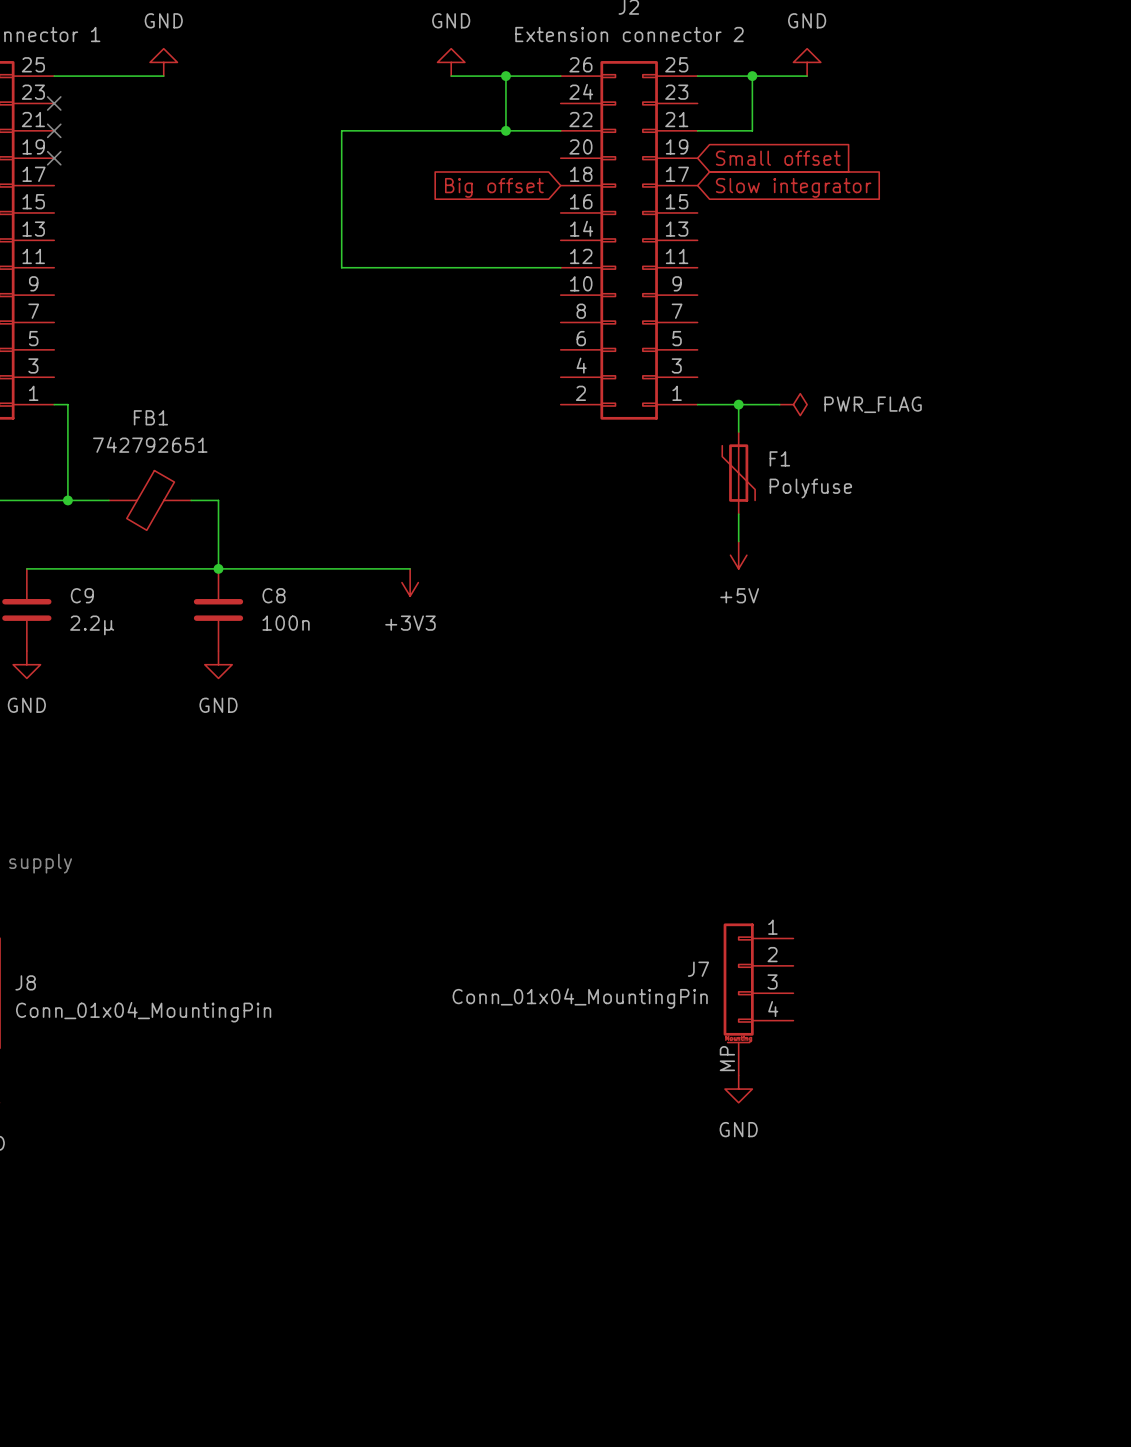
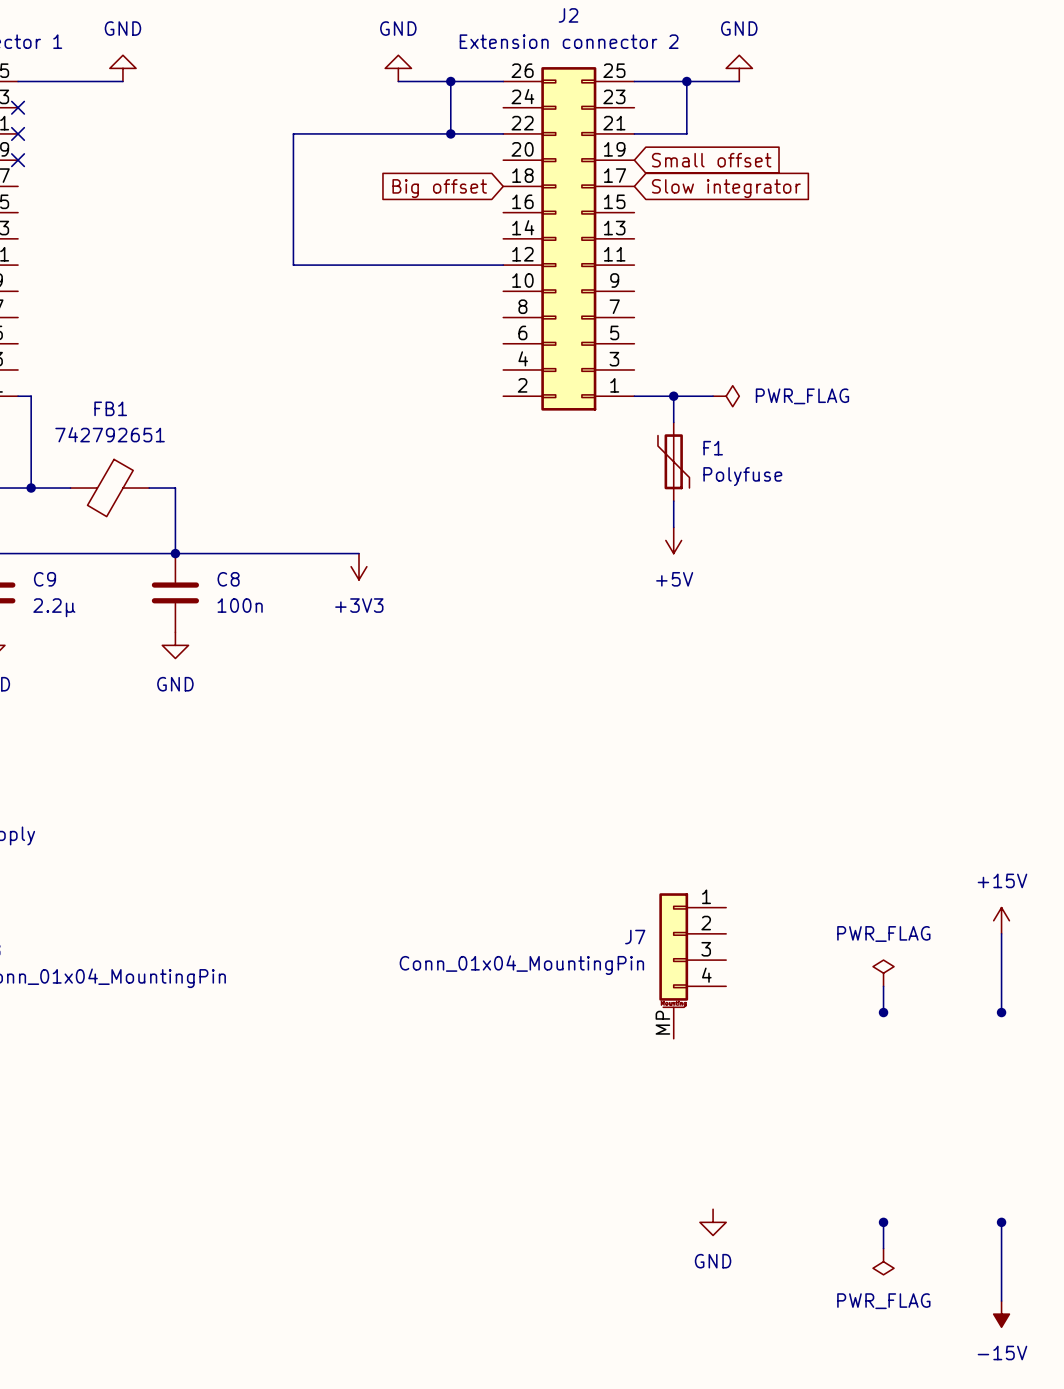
power symbol: none -> +15V (1001, 920)
wire: none -> (1001, 933) (1001, 1012)
power symbol: none -> PWR_FLAG (883, 973)
wire: none -> (883, 986) (883, 1012)
junction: none -> (883, 1012)
junction: none -> (1001, 1012)
power symbol position: GND (738, 1089) -> GND (713, 1222)
wire: none -> (883, 1222) (883, 1248)
junction: none -> (883, 1222)
wire: none -> (1001, 1222) (1001, 1301)
junction: none -> (1001, 1222)
power symbol: none -> PWR_FLAG (883, 1261)
power symbol: none -> -15V (1001, 1314)

